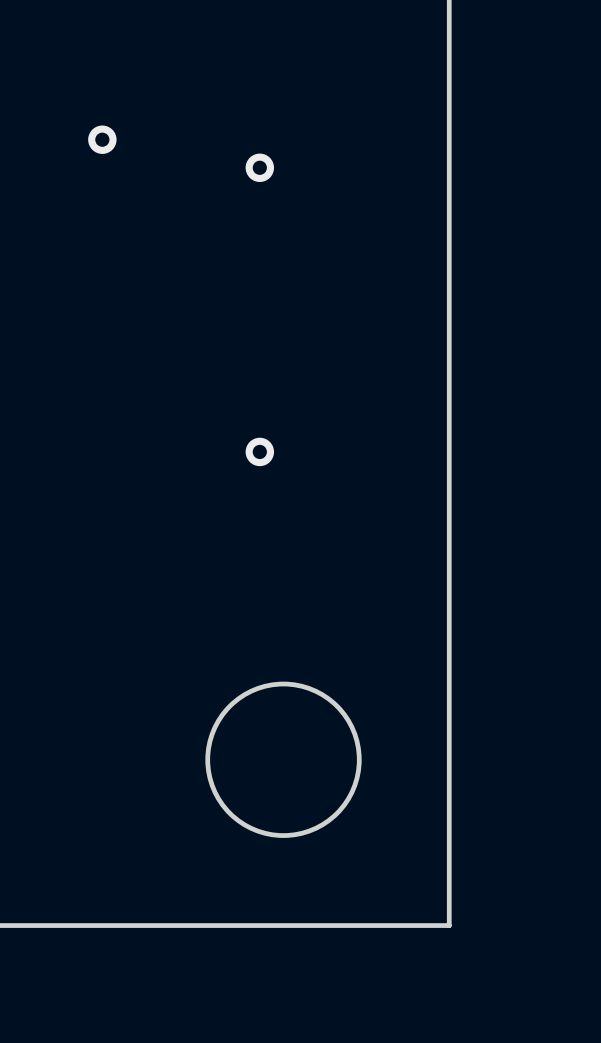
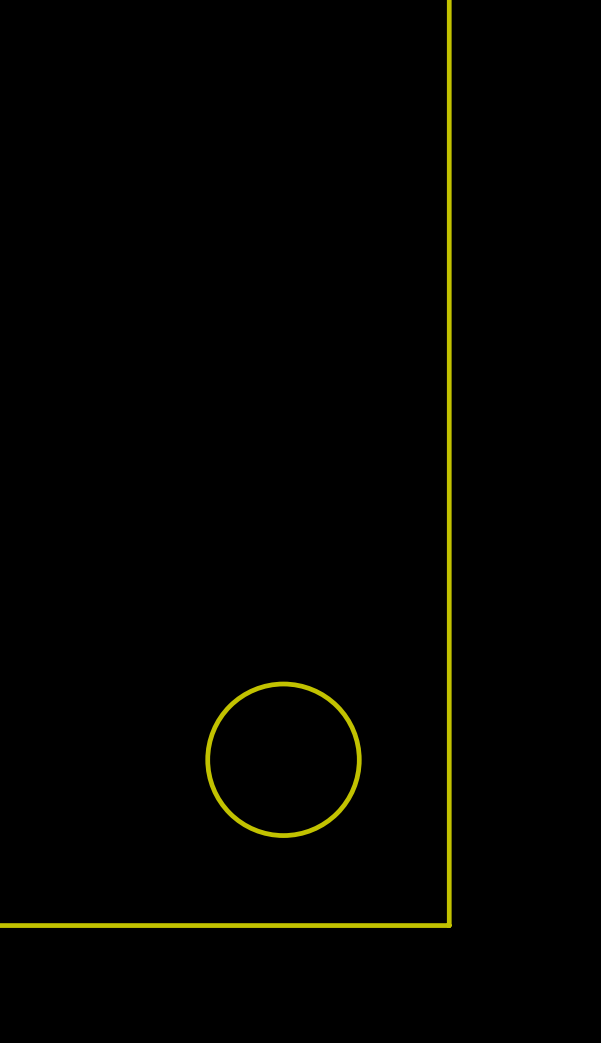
via: (102, 139) -> none
via: (259, 167) -> none
via: (259, 451) -> none

